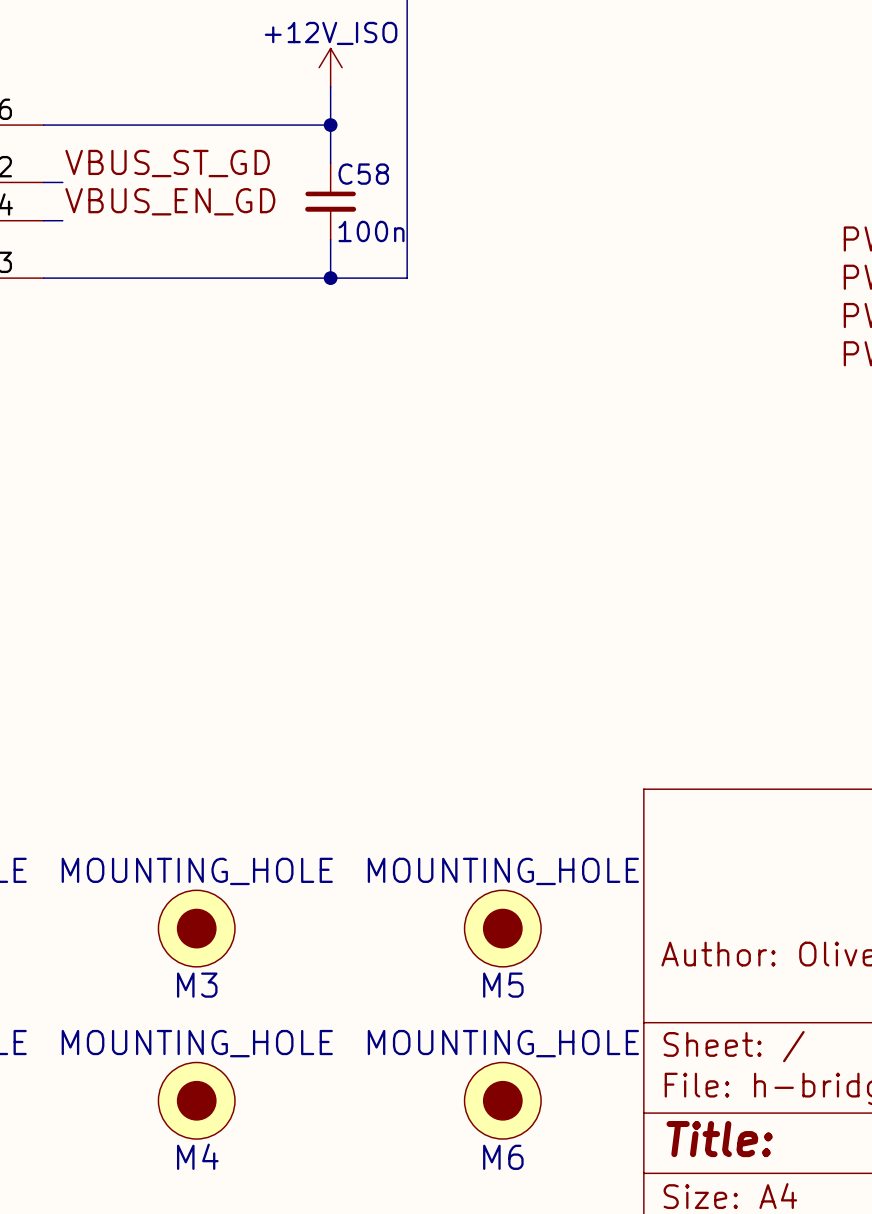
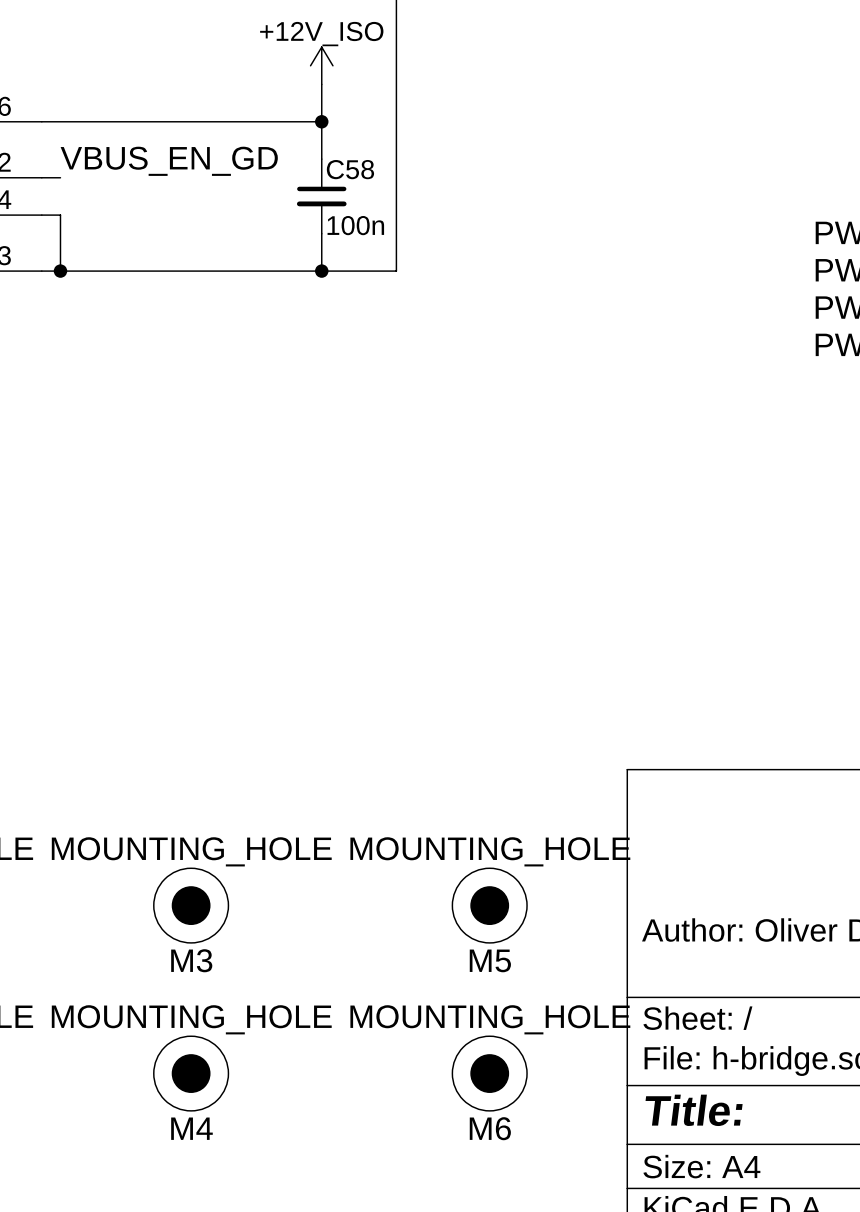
label: VBUS_ST_GD (167, 163) -> VBUS_EN_GD (169, 161)
label: VBUS_EN_GD (170, 201) -> none
wire: none -> (60, 215) (60, 271)
junction: none -> (60, 271)

